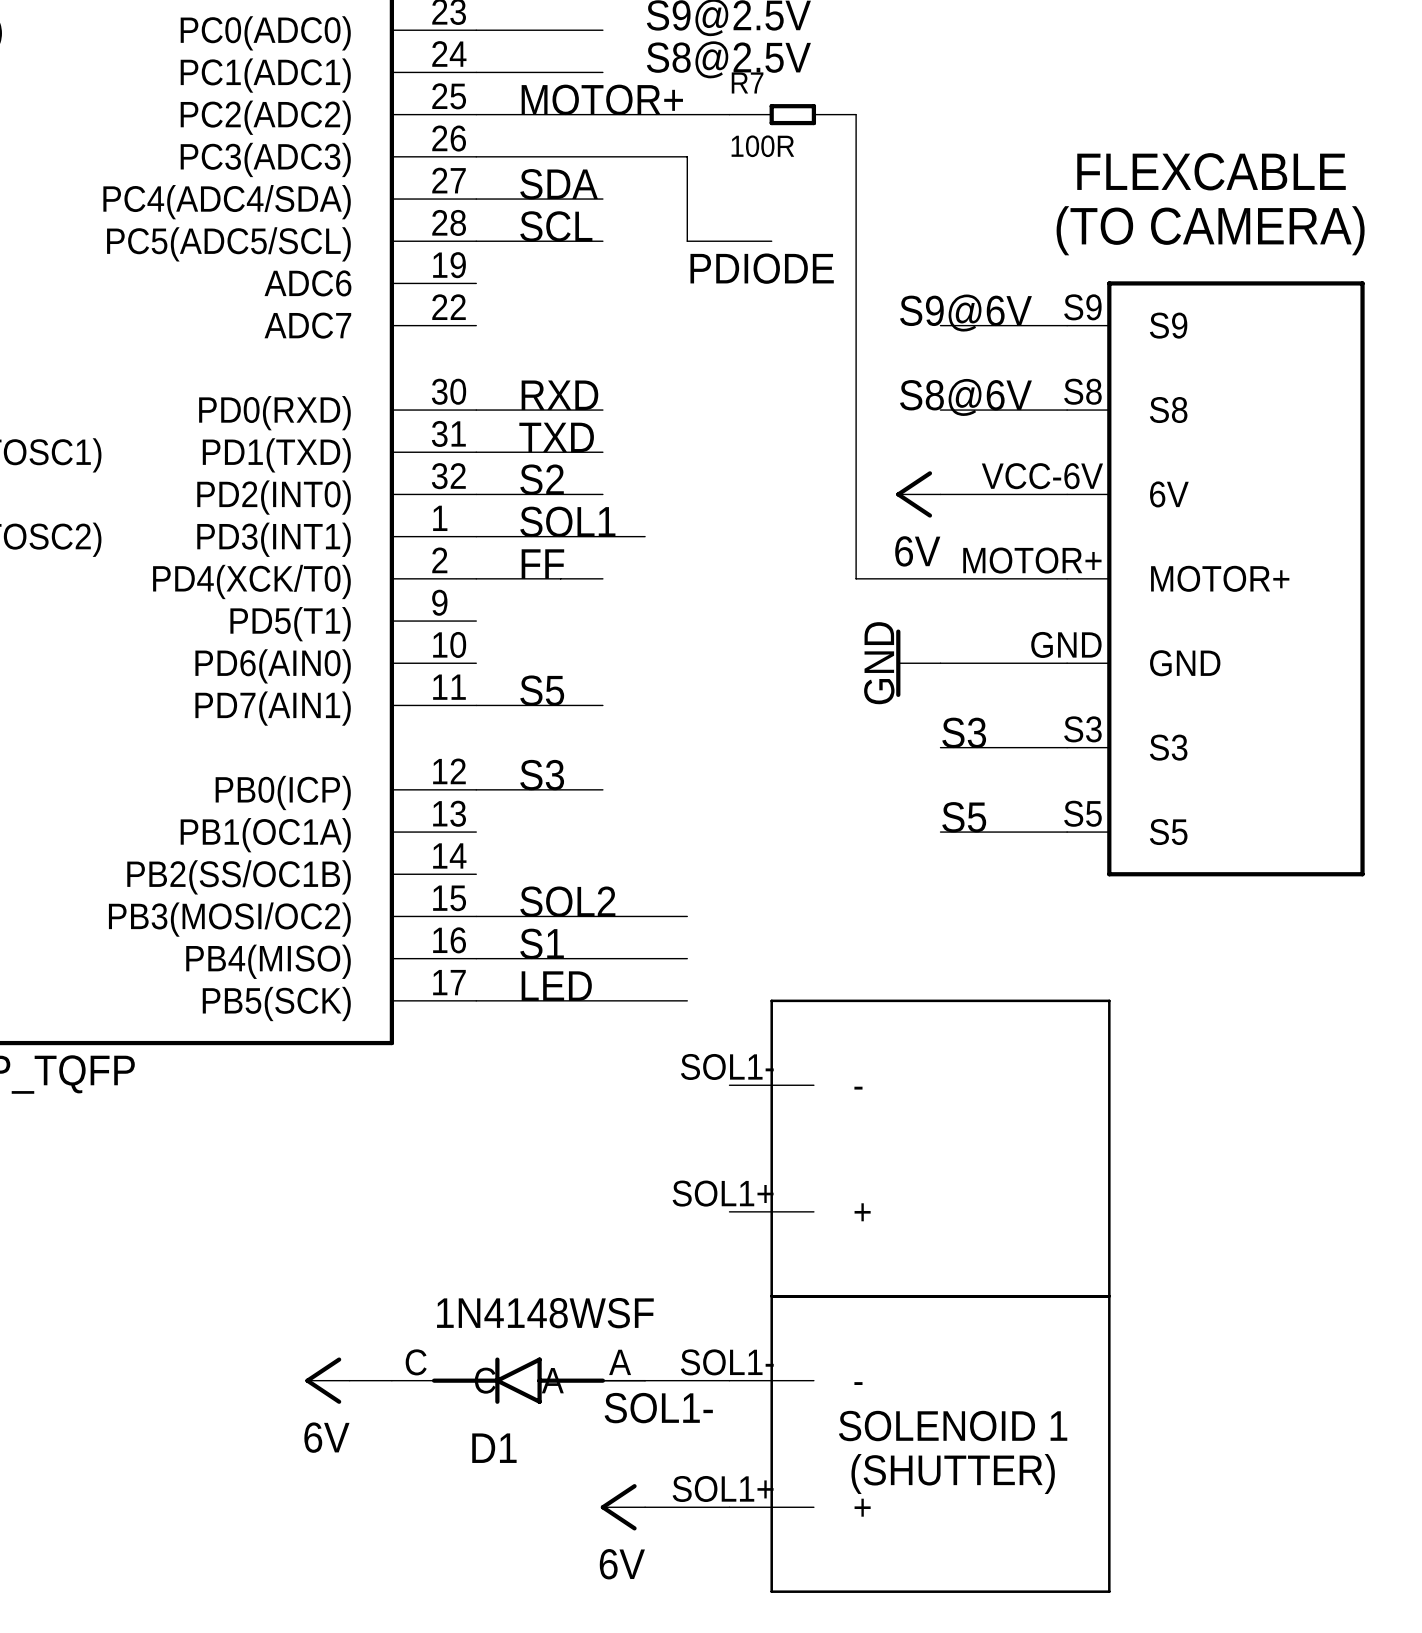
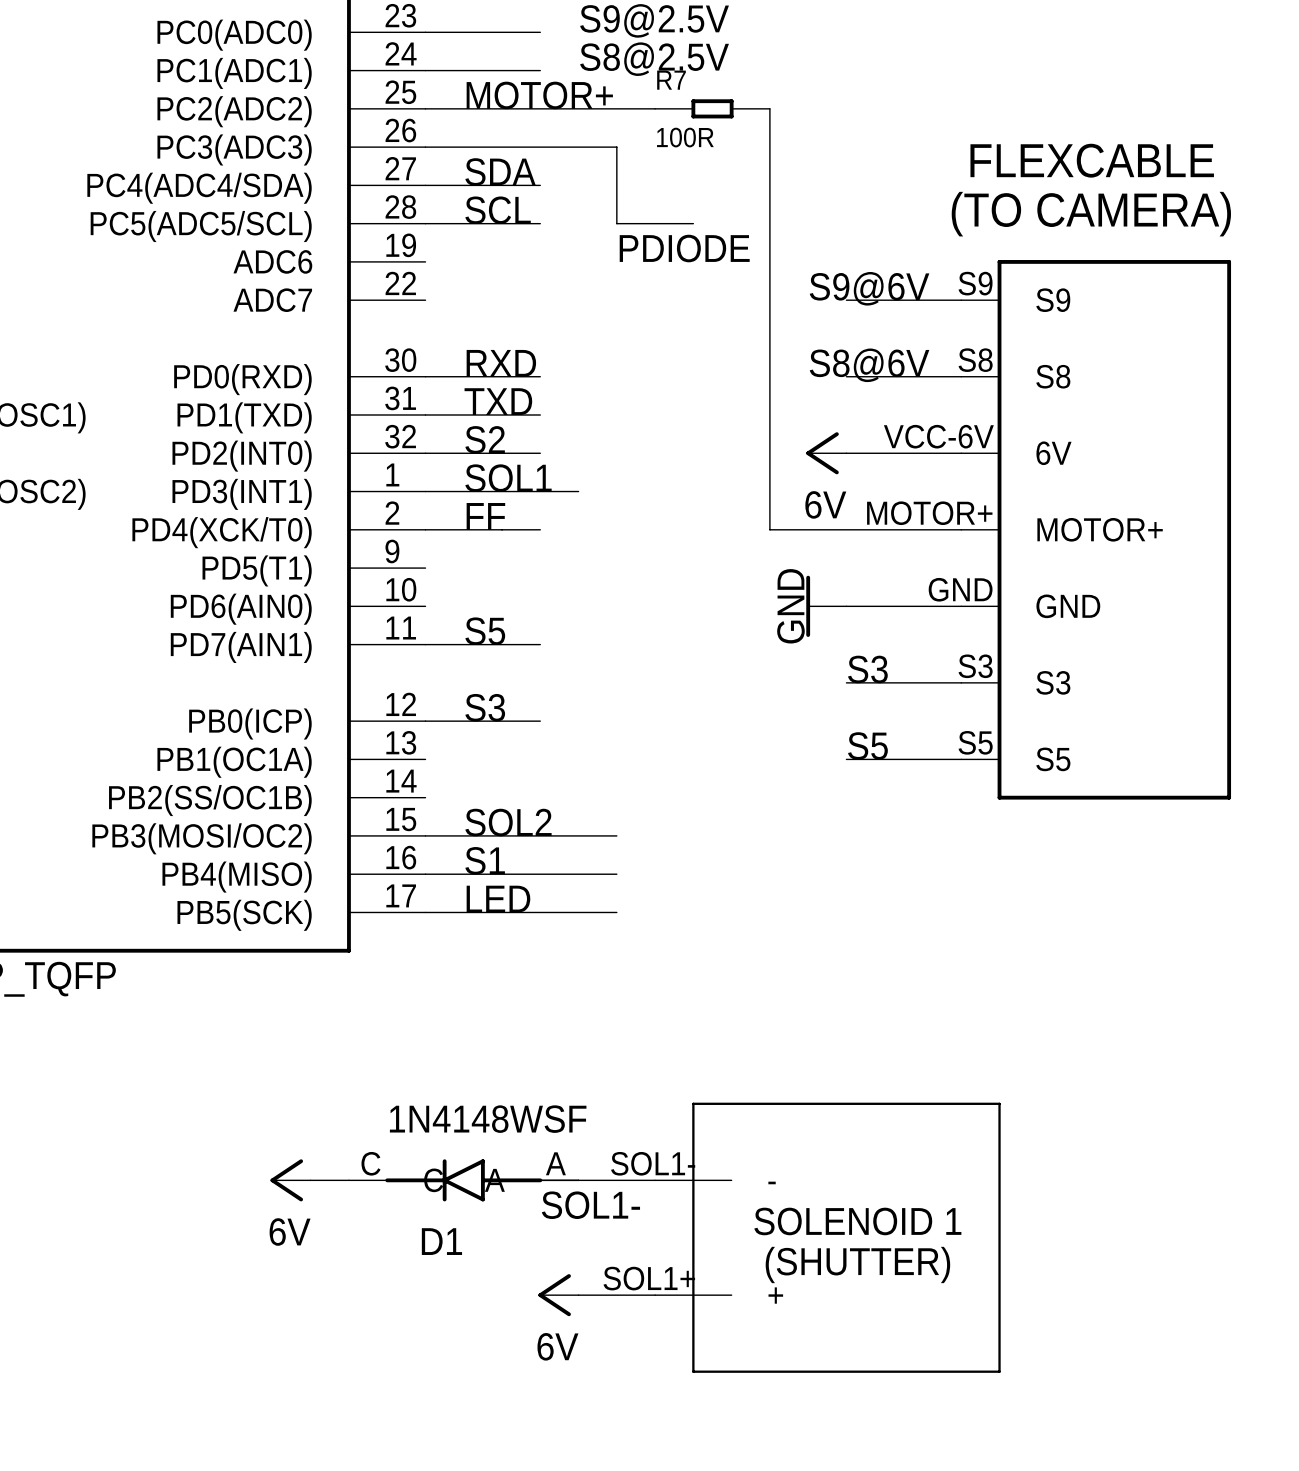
part: (920, 1148) -> none
power symbol position: 6V (327, 1380) -> 6V (290, 1180)
wire: (349, 1380) (391, 1380) -> (310, 1180) (348, 1180)
D1 position: (518, 1380) -> (463, 1180)
wire: (602, 1380) (729, 1380) -> (540, 1180) (655, 1180)
label position: SOL1- (658, 1408) -> SOL1- (590, 1205)
text position: SOLENOID 1 (953, 1426) -> SOLENOID 1 (857, 1221)
part position: (920, 1443) -> (827, 1237)
text position: (SHUTTER) (953, 1474) -> (SHUTTER) (857, 1264)
power symbol position: 6V (622, 1507) -> 6V (558, 1295)
wire: (645, 1507) (729, 1507) -> (578, 1295) (655, 1295)

